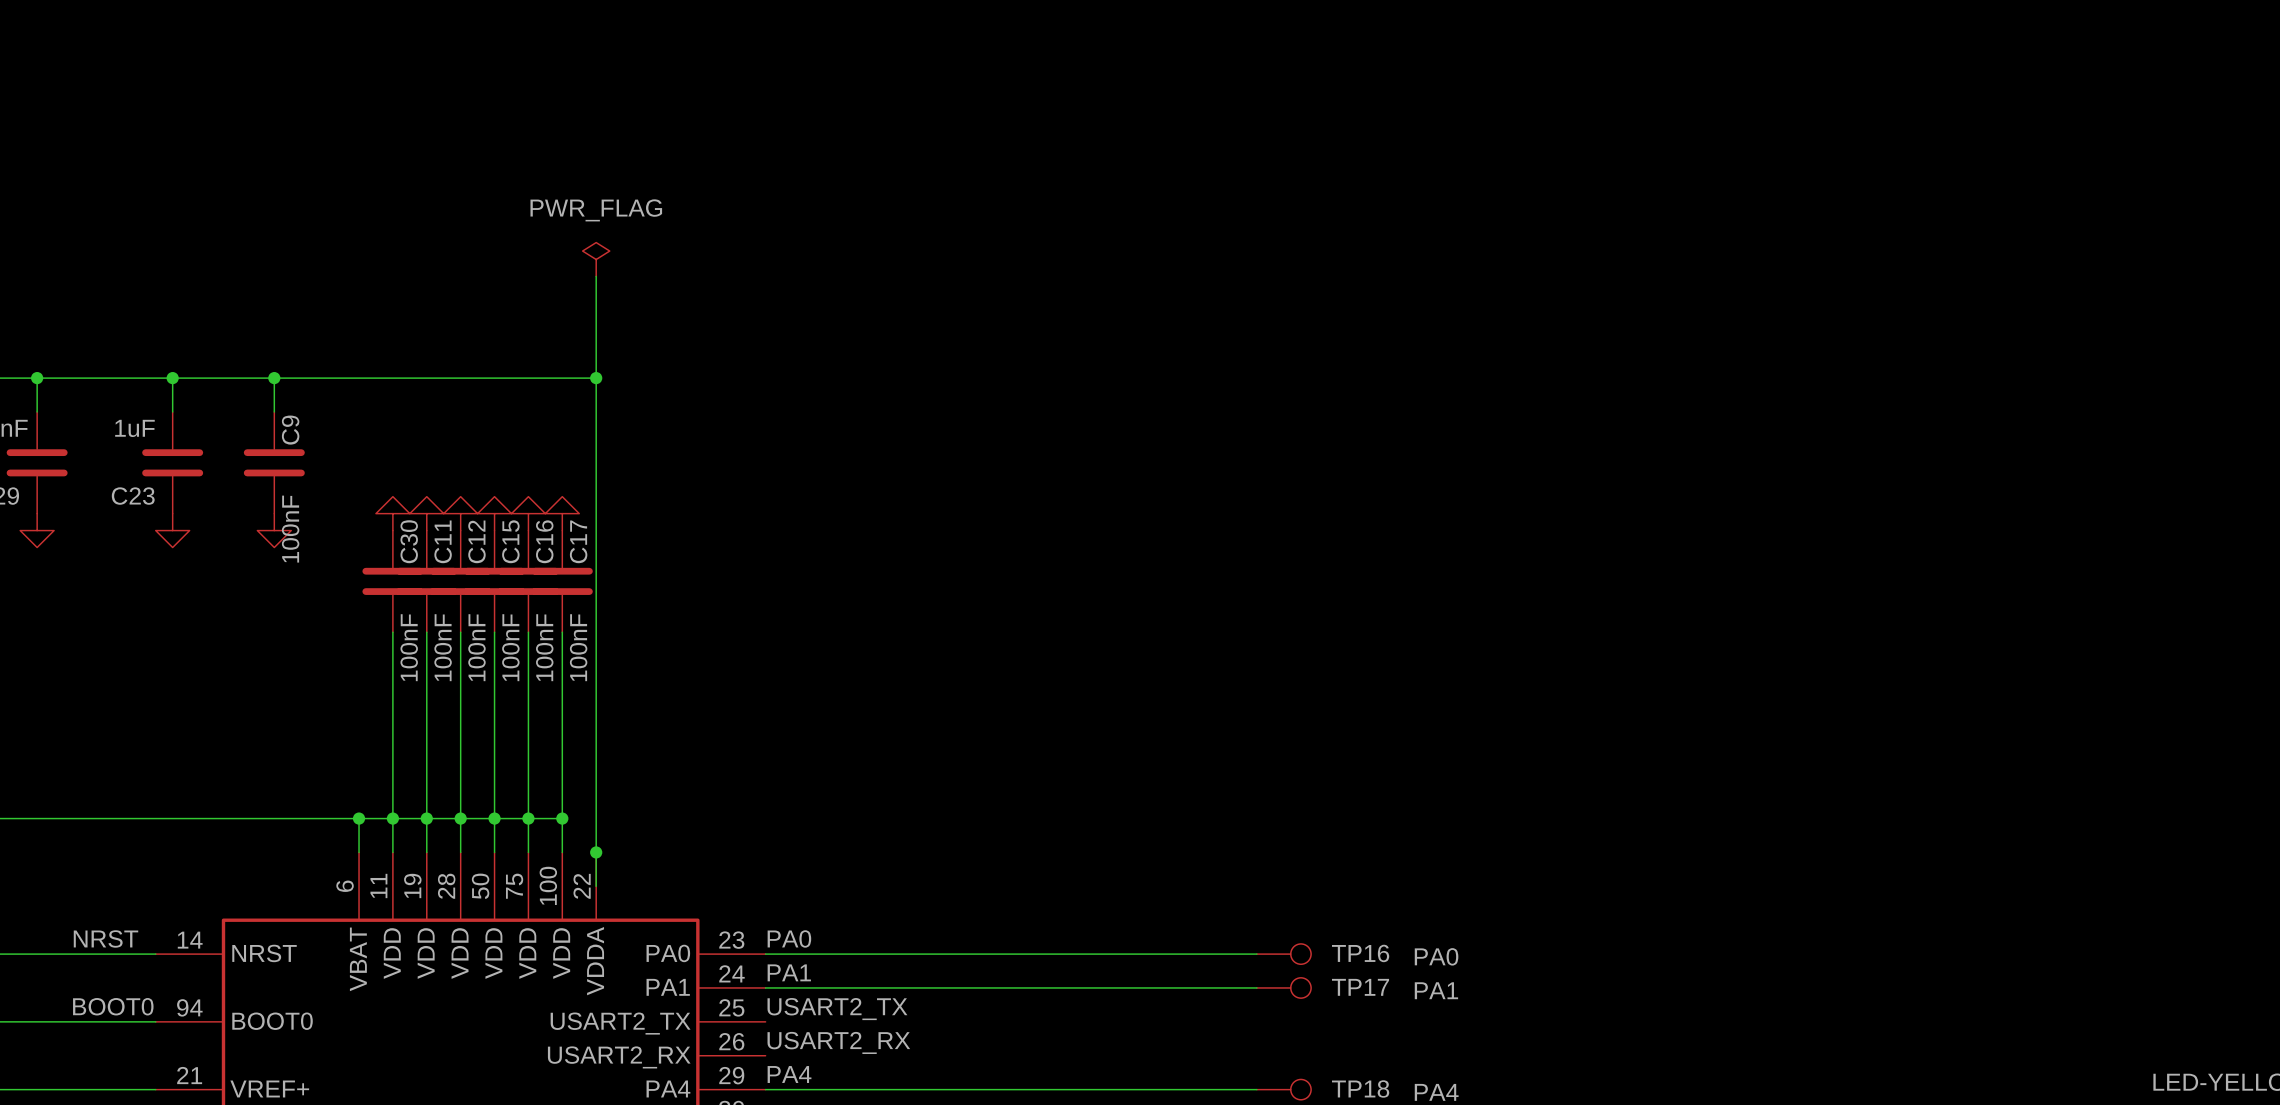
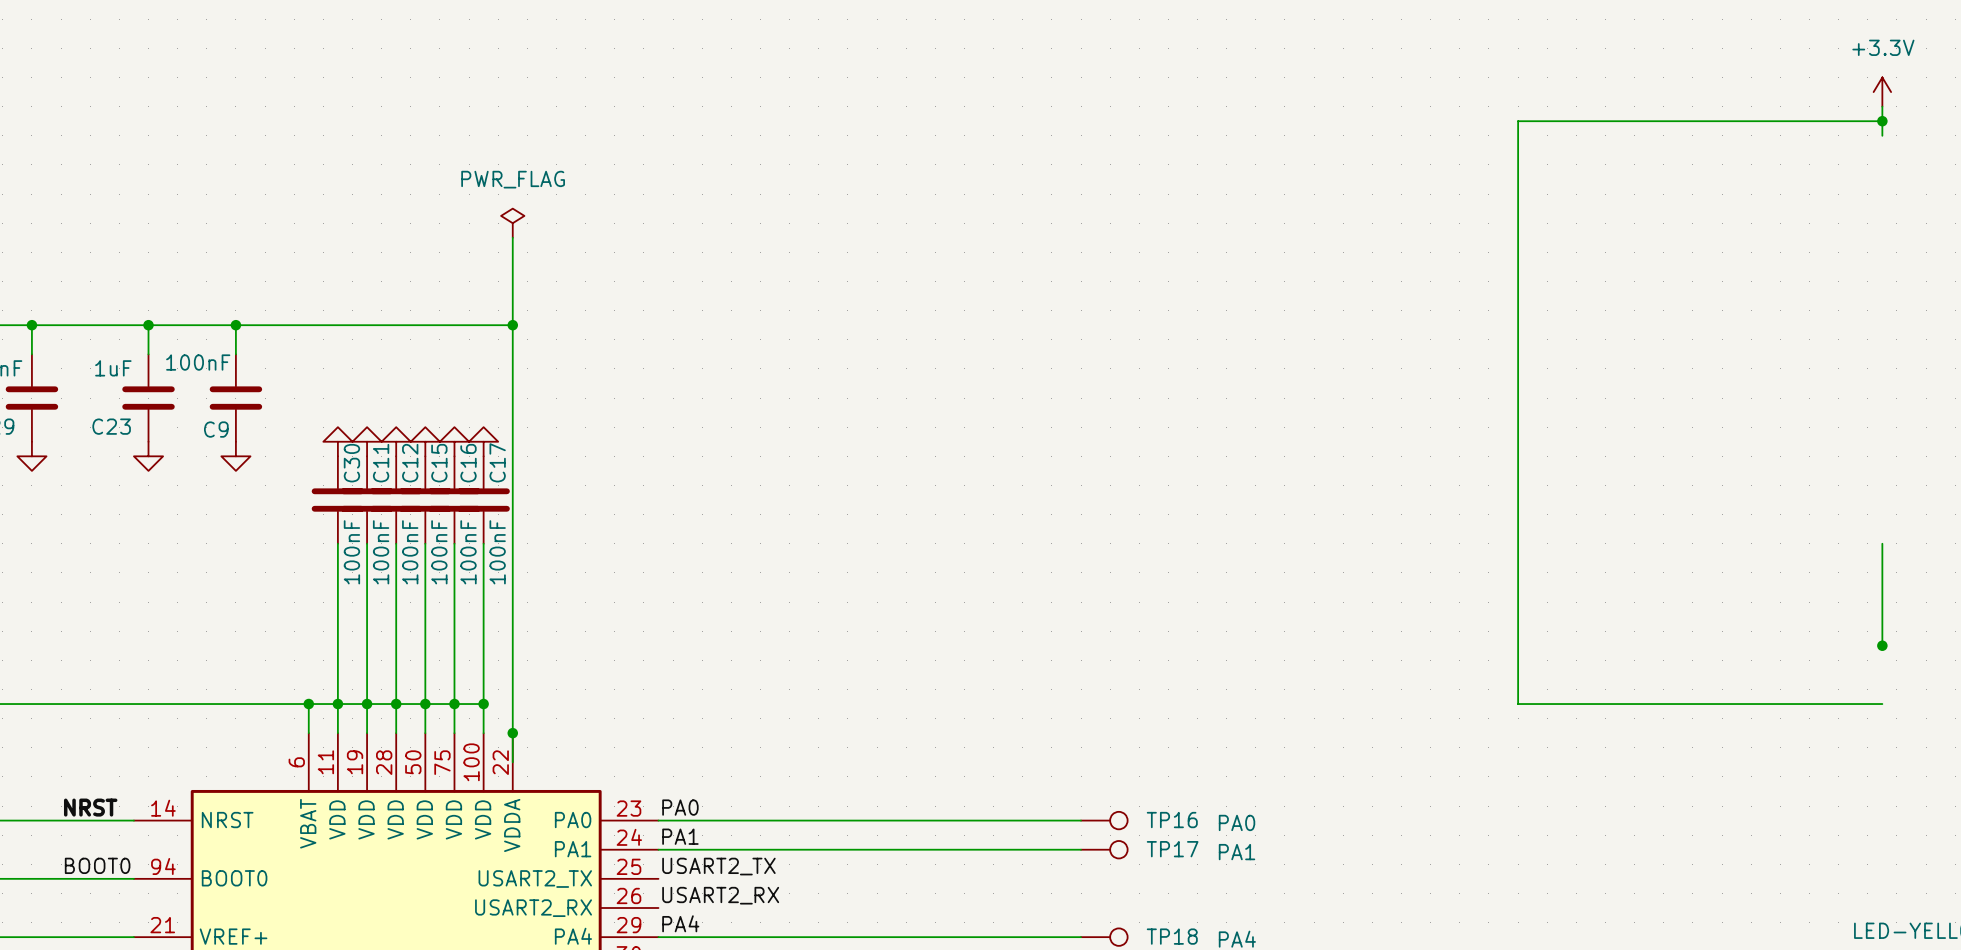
power symbol: none -> +3.3V (1882, 92)
wire: none -> (1882, 106) (1882, 135)
wire: none -> (1882, 121) (1518, 121) (1518, 704) (1882, 704)
junction: none -> (1882, 121)
C9 name rotation: 0° (290, 430) -> 90° clockwise (216, 429)
C9 name position: C9 (290, 430) -> C9 (216, 429)
C9 value rotation: 0° (290, 529) -> 90° clockwise (198, 362)
C9 value position: 100nF (290, 529) -> 100nF (198, 362)
wire: none -> (1882, 543) (1882, 645)
junction: none -> (1882, 645)

